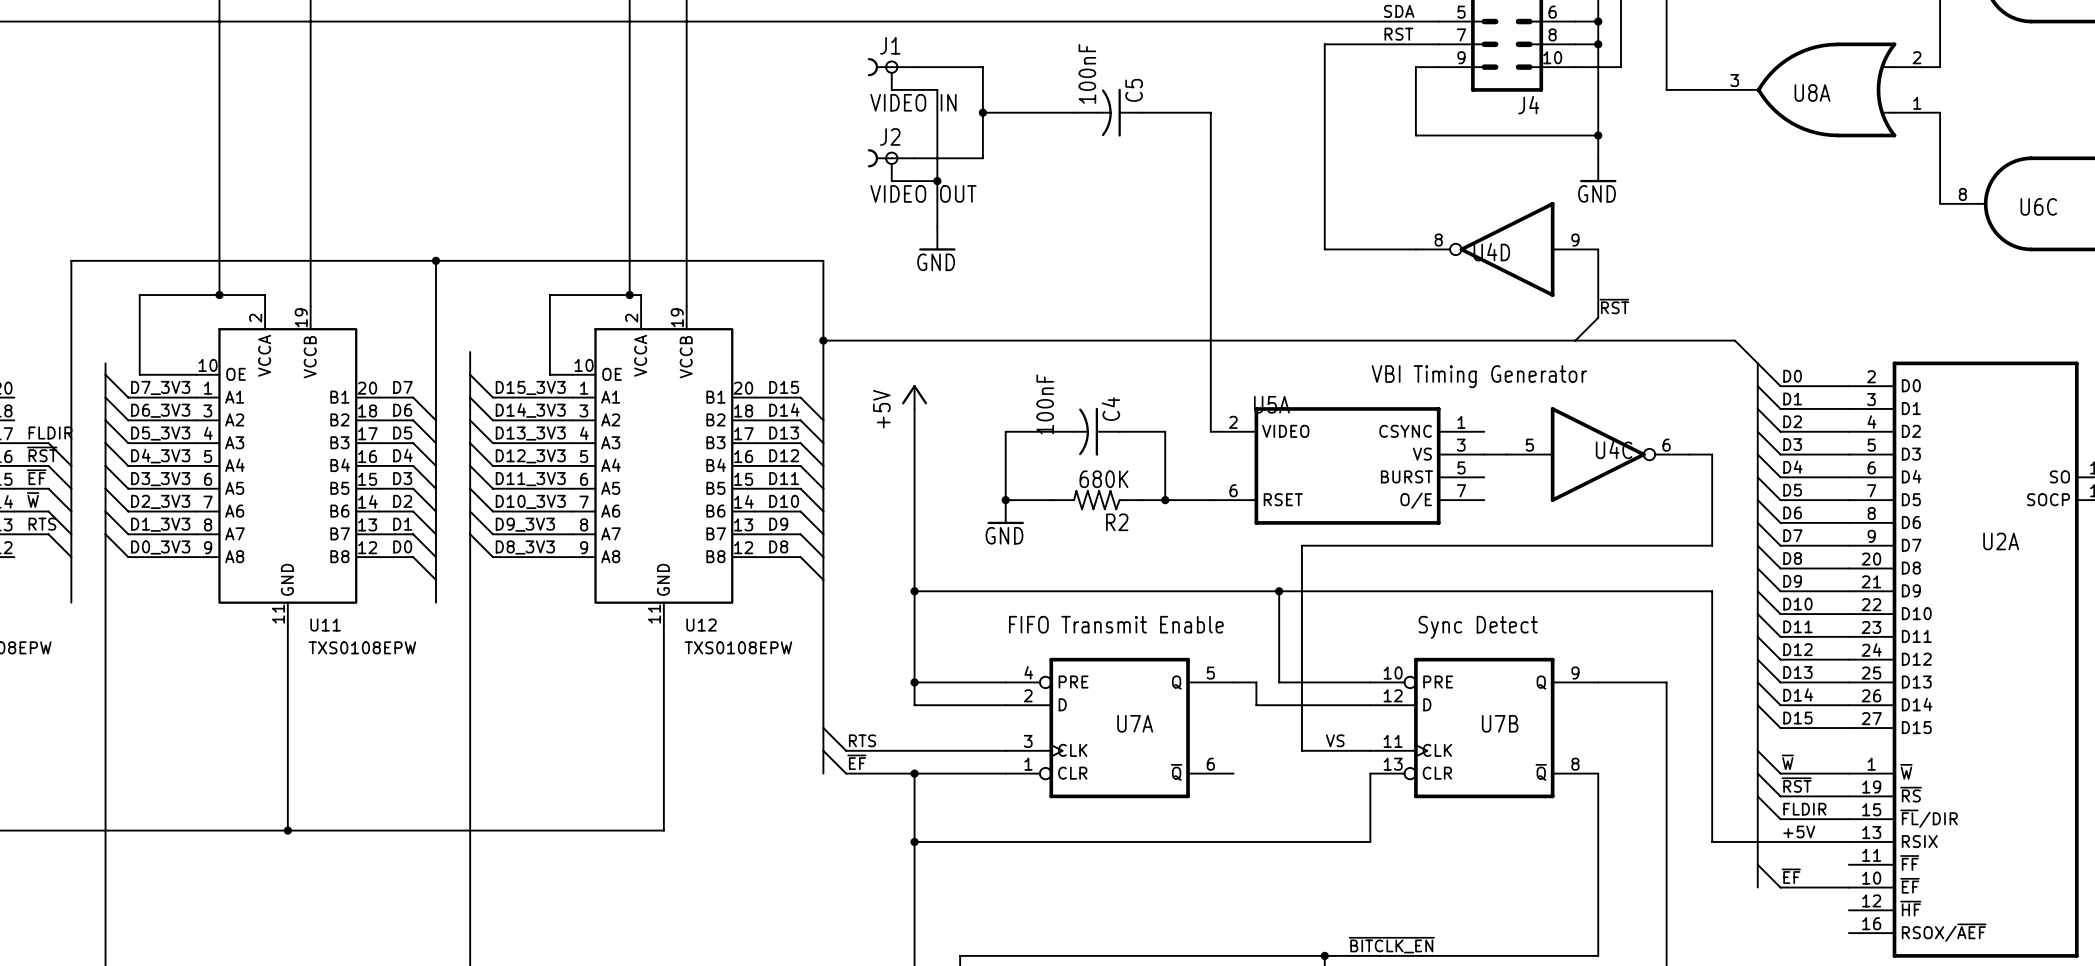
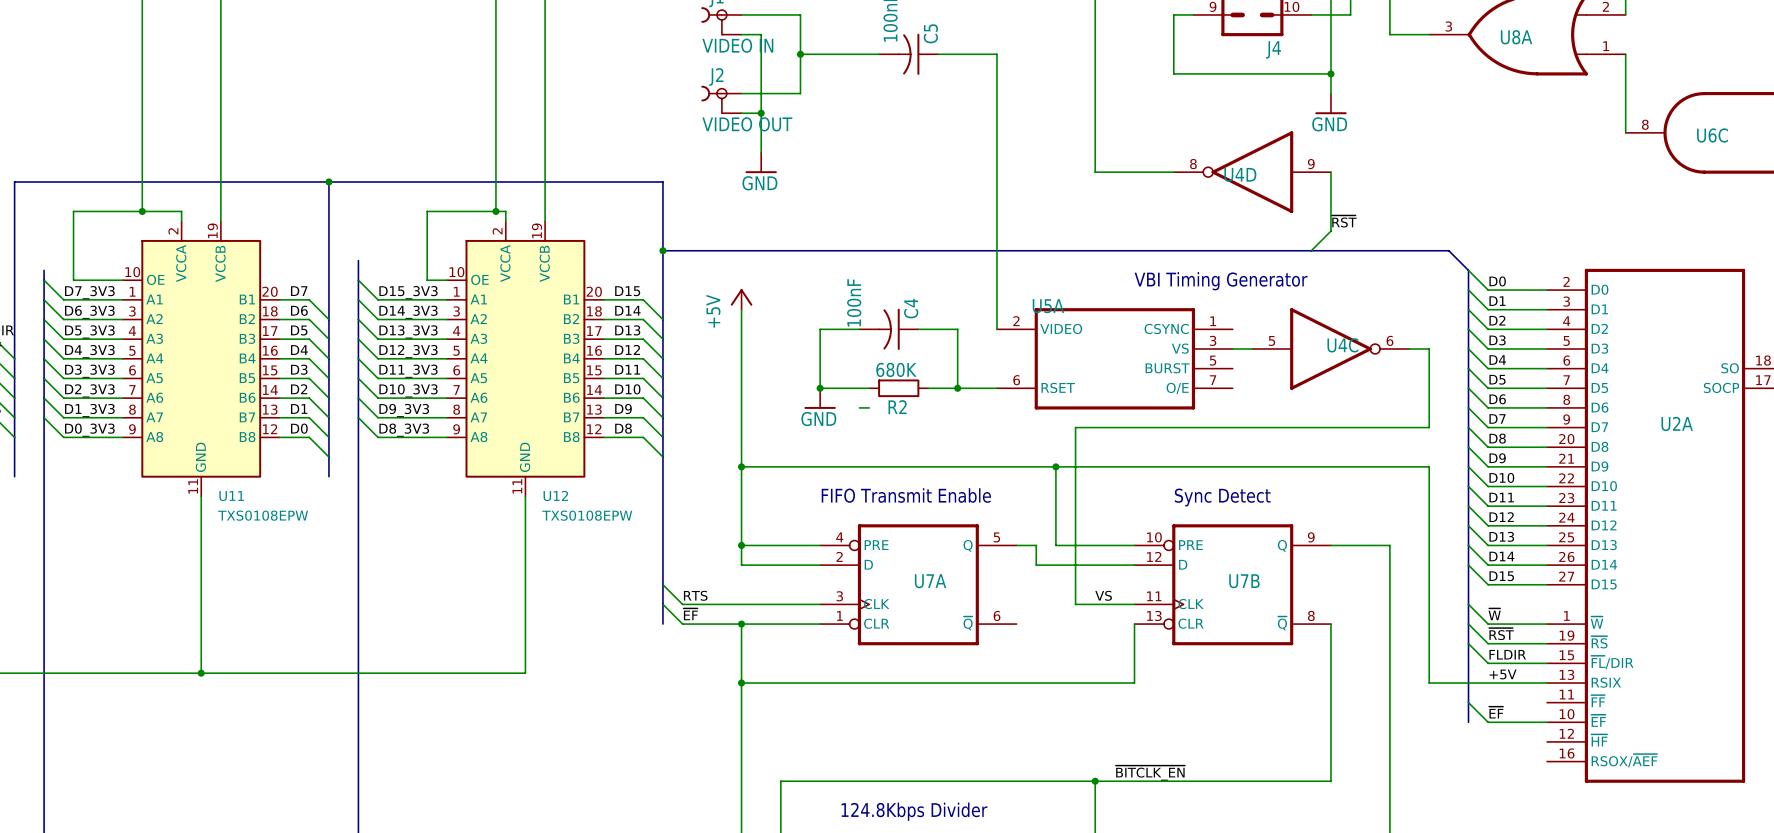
R2 symbol: [1051, 490, 1143, 511] -> [869, 379, 929, 398]
wire: none -> (859, 407) (869, 407)

